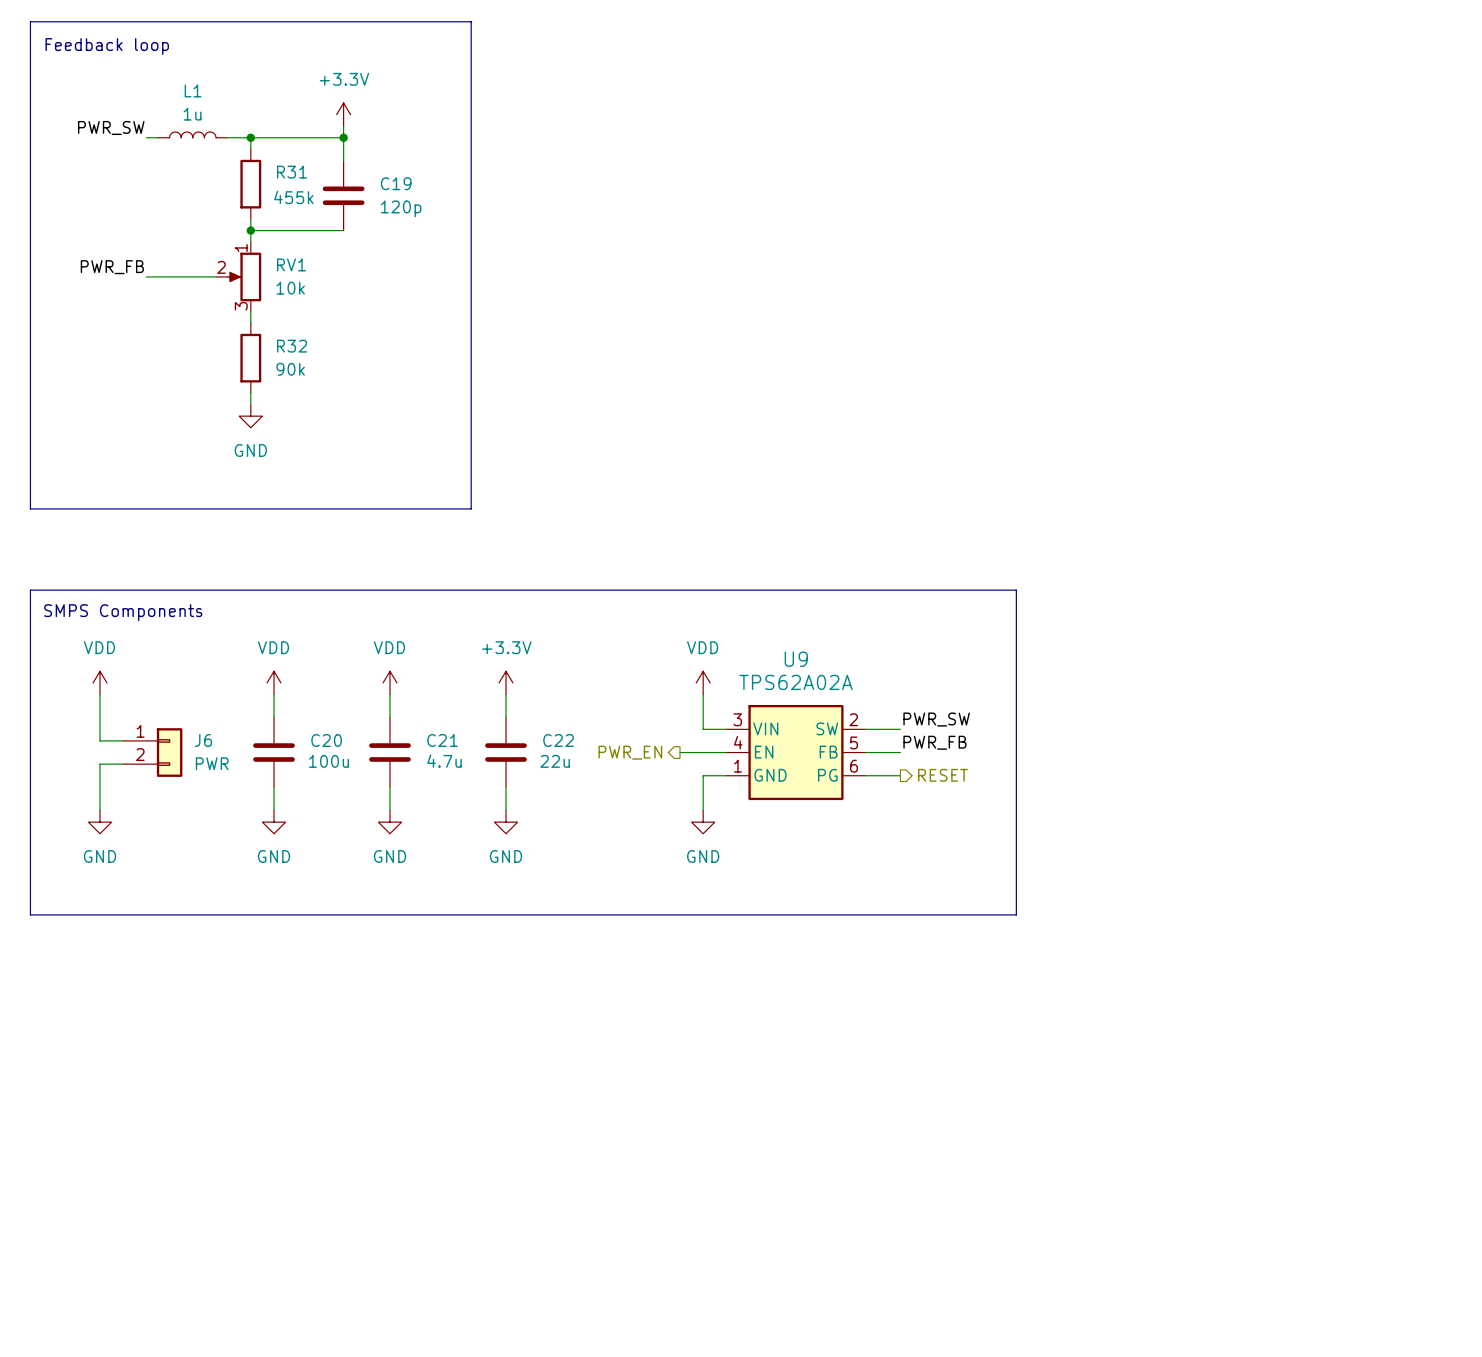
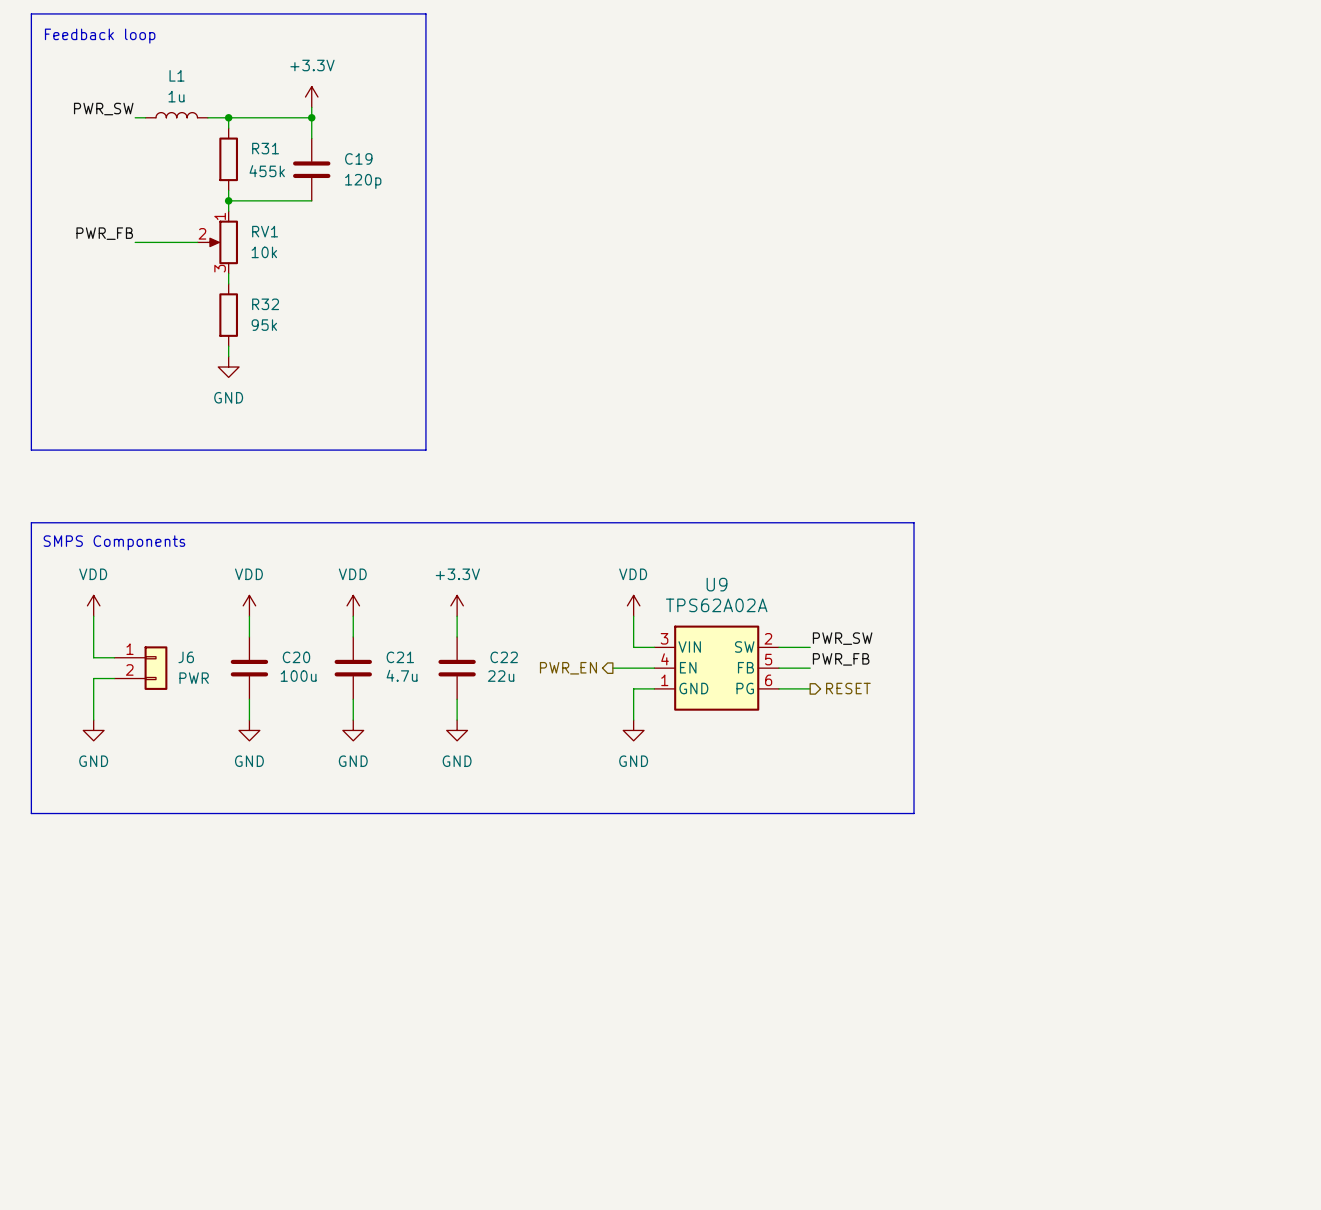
R32 value: 90k (290, 369) -> 95k (264, 325)

